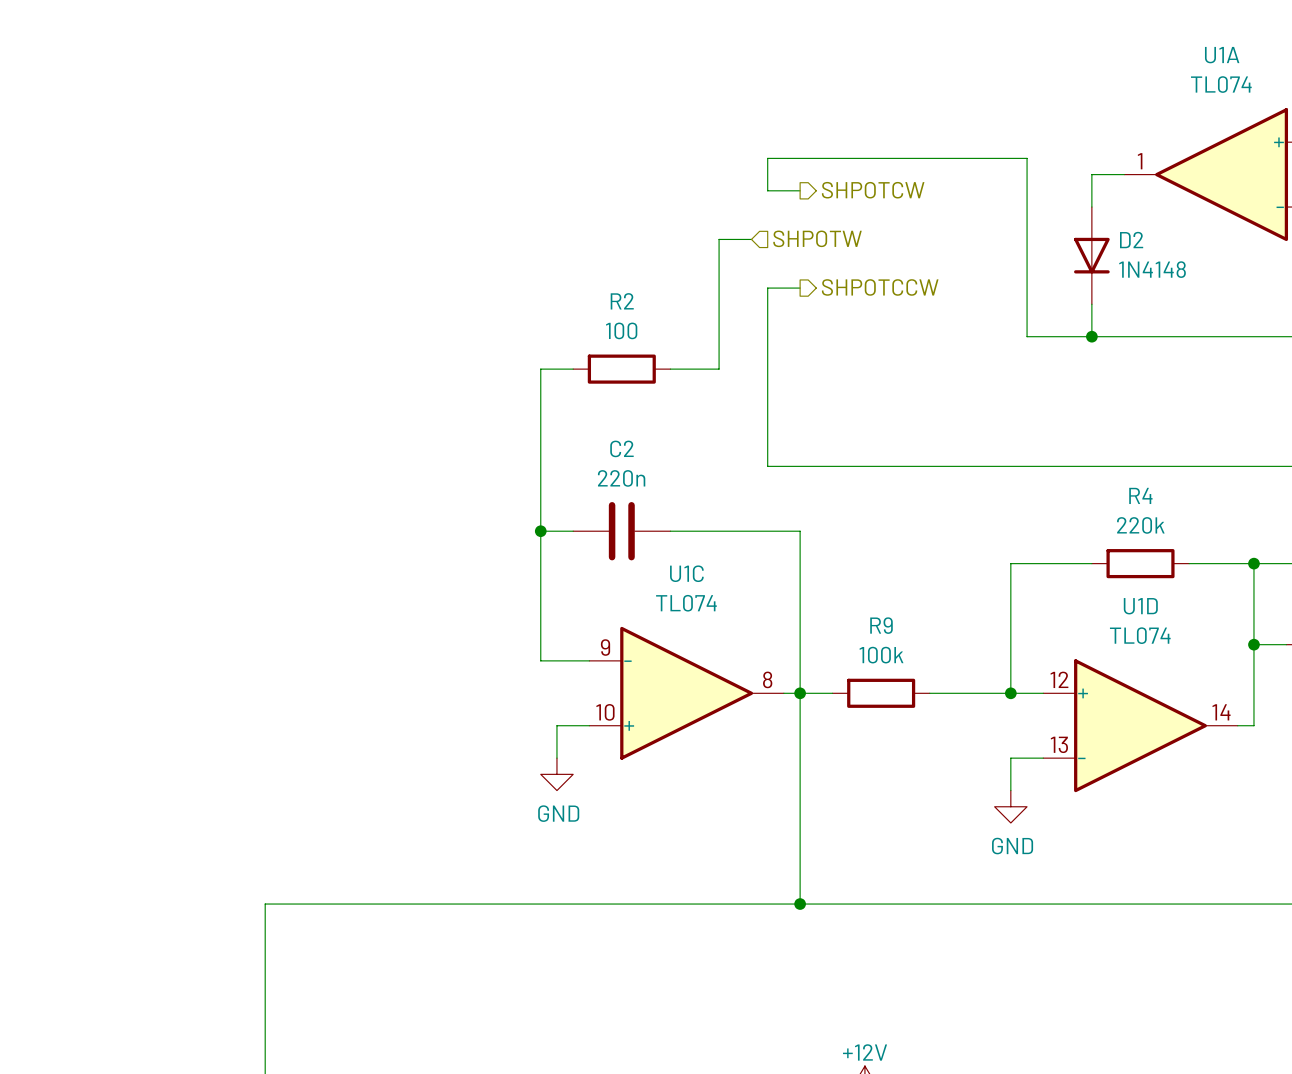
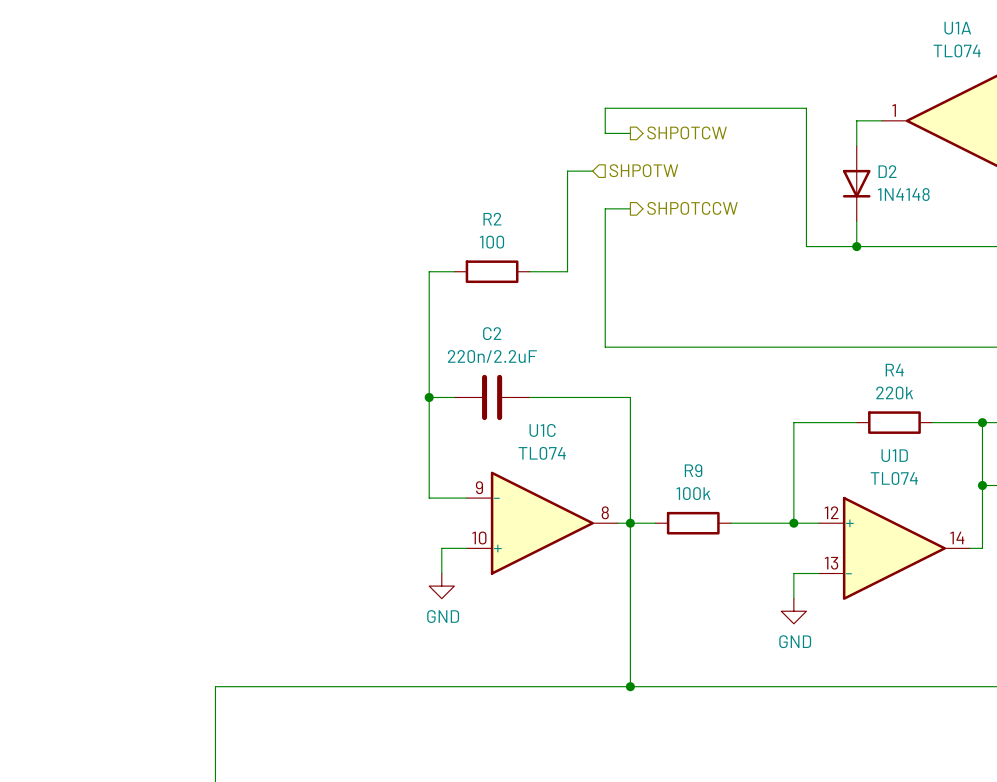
C2 value: 220n (621, 478) -> 220n/2.2uF (492, 356)

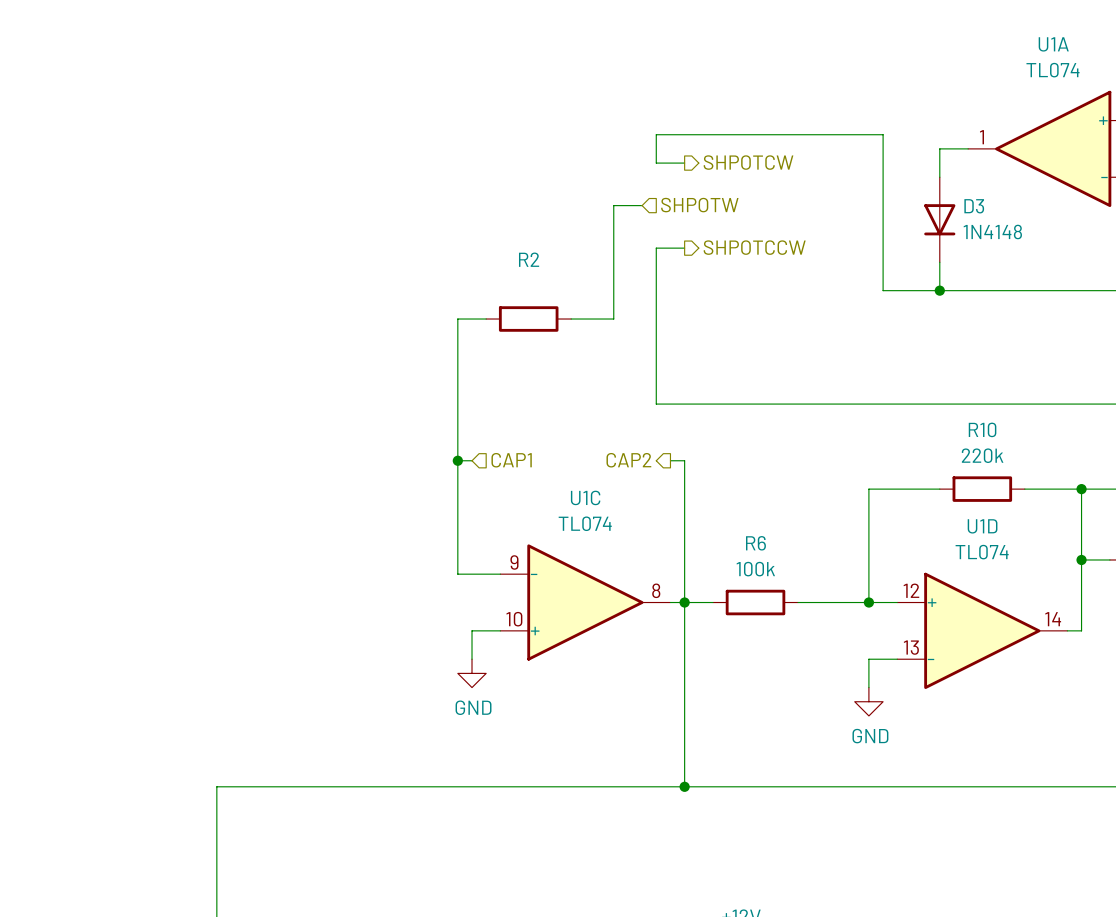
D2 name: D2 (887, 171) -> D3 (974, 206)
R2 value: 100 (491, 242) -> none
R4 name: R4 (894, 370) -> R10 (982, 429)
wire: (441, 397) (454, 397) -> none
hierarchical label: none -> CAP1 (511, 460)
C2: 220n/2.2uF (492, 397) -> none
wire: (529, 397) (617, 397) -> none
hierarchical label: none -> CAP2 (628, 460)
R9 name: R9 (693, 470) -> R6 (755, 543)

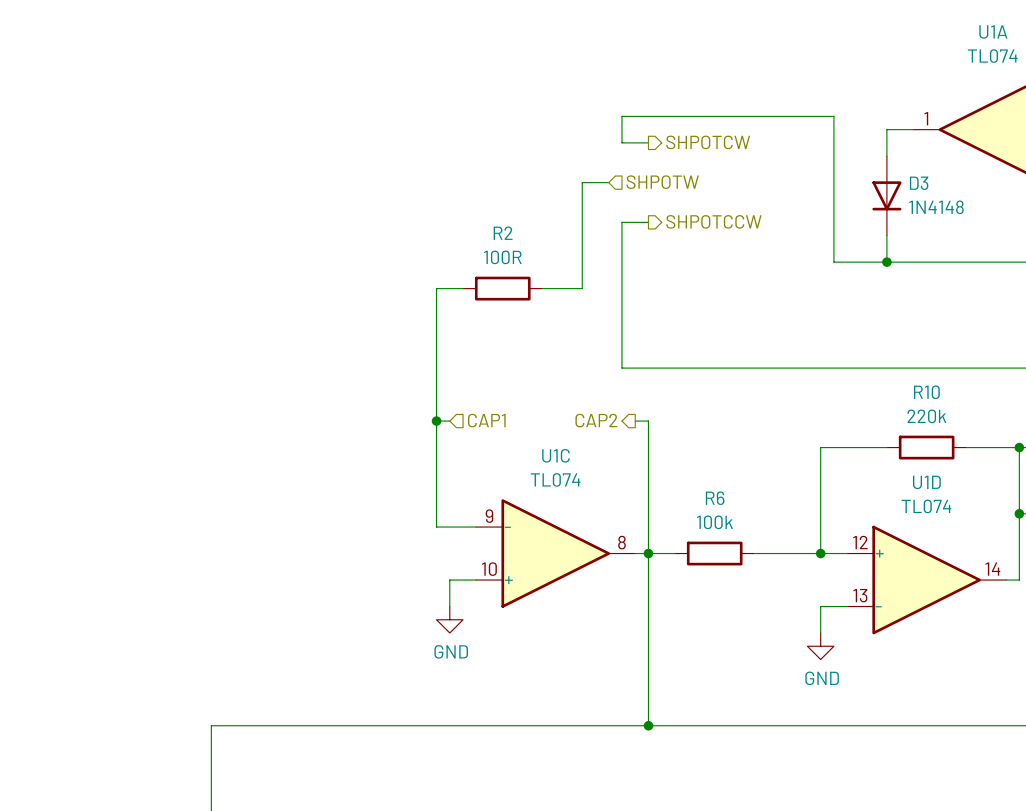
R2 value: none -> 100R (502, 257)

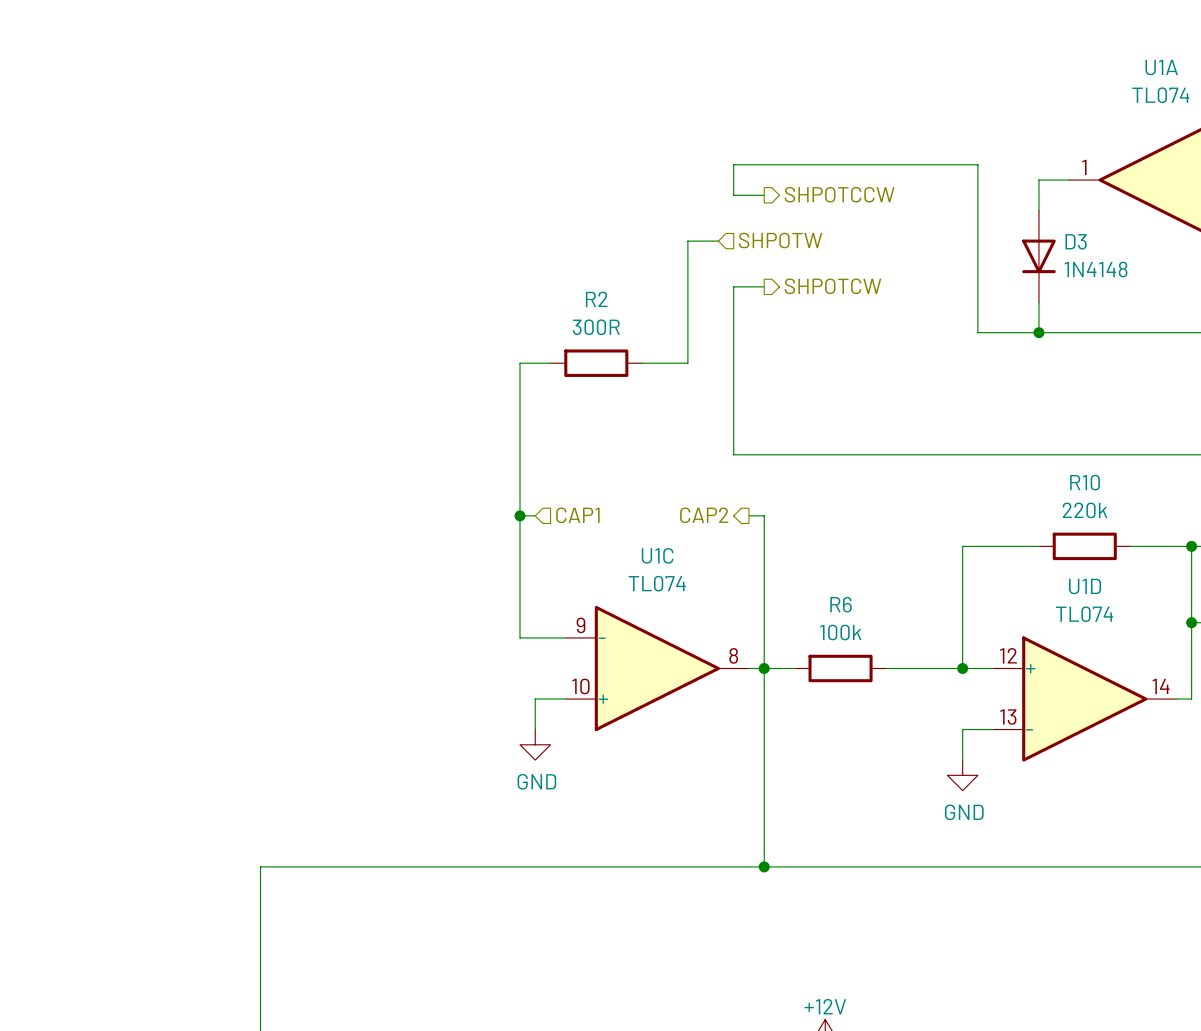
hierarchical label: SHPOTCW (708, 142) -> SHPOTCCW (839, 194)
hierarchical label: SHPOTCCW (713, 221) -> SHPOTCW (833, 286)
R2 value: 100R (502, 257) -> 300R (596, 327)

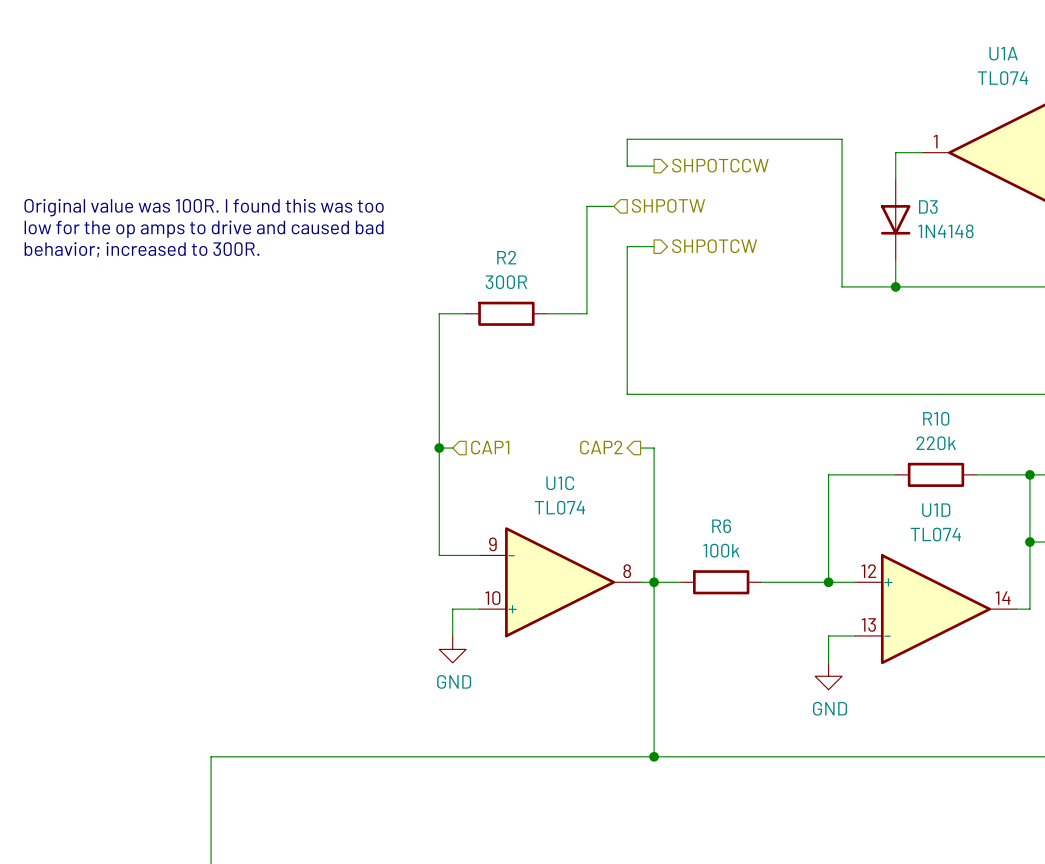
text: none -> Original value was 100R. I found this was too (204, 207)
text: none -> low for the op amps to drive and caused bad (204, 229)
text: none -> behavior; increased to 300R. (142, 249)

